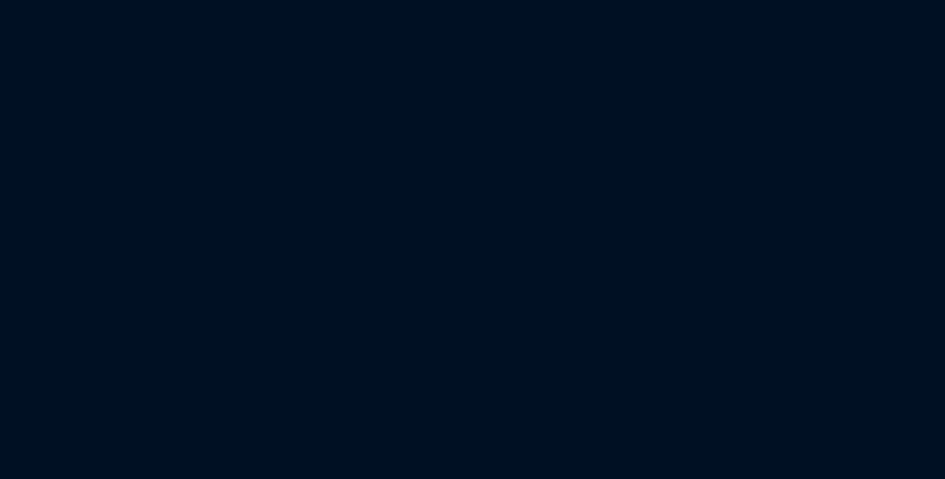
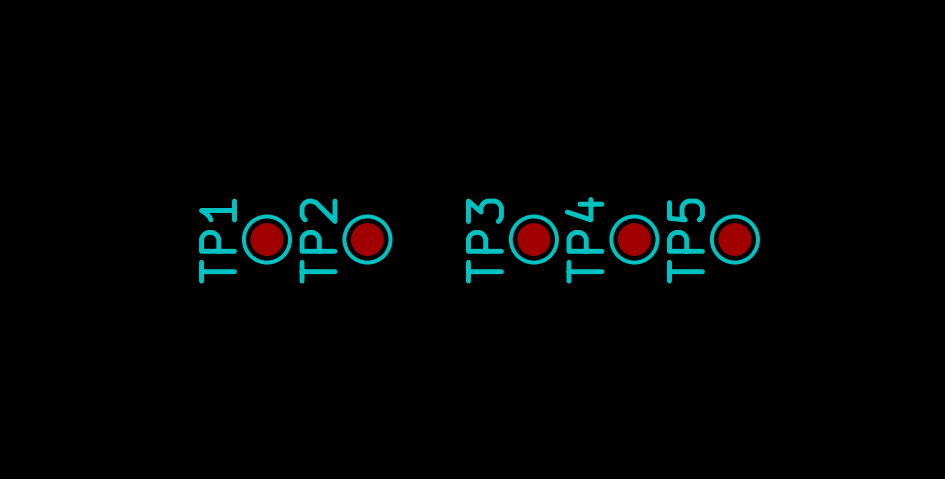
TP1: none -> (266, 239)
TP2: none -> (367, 239)
TP3: none -> (533, 239)
TP4: none -> (634, 239)
TP5: none -> (734, 239)

